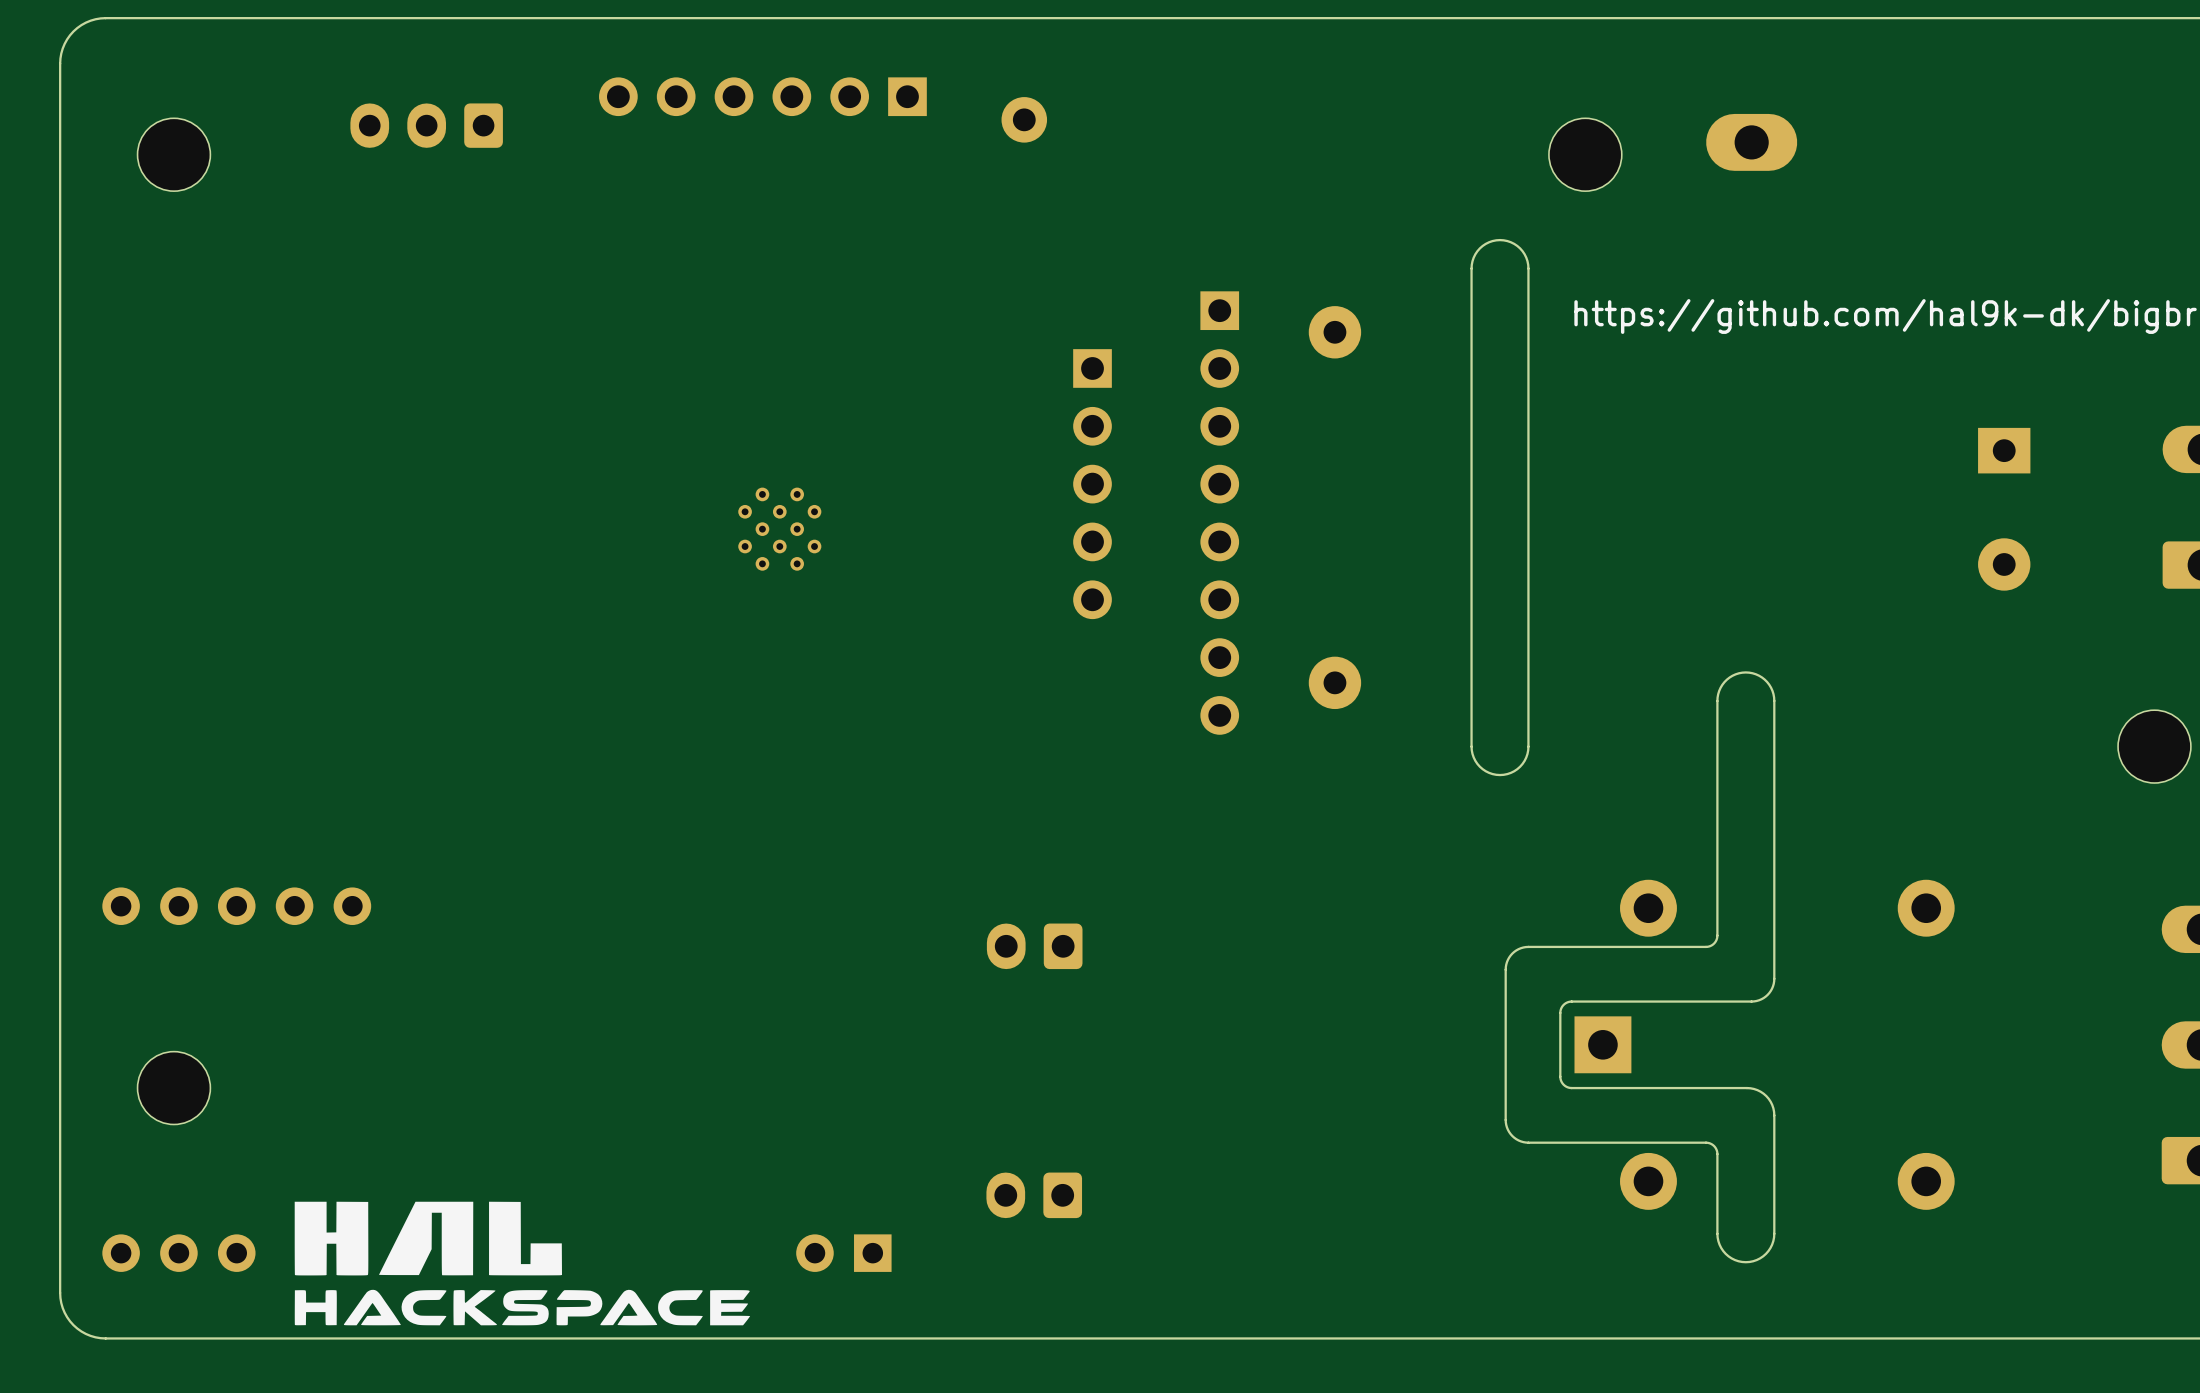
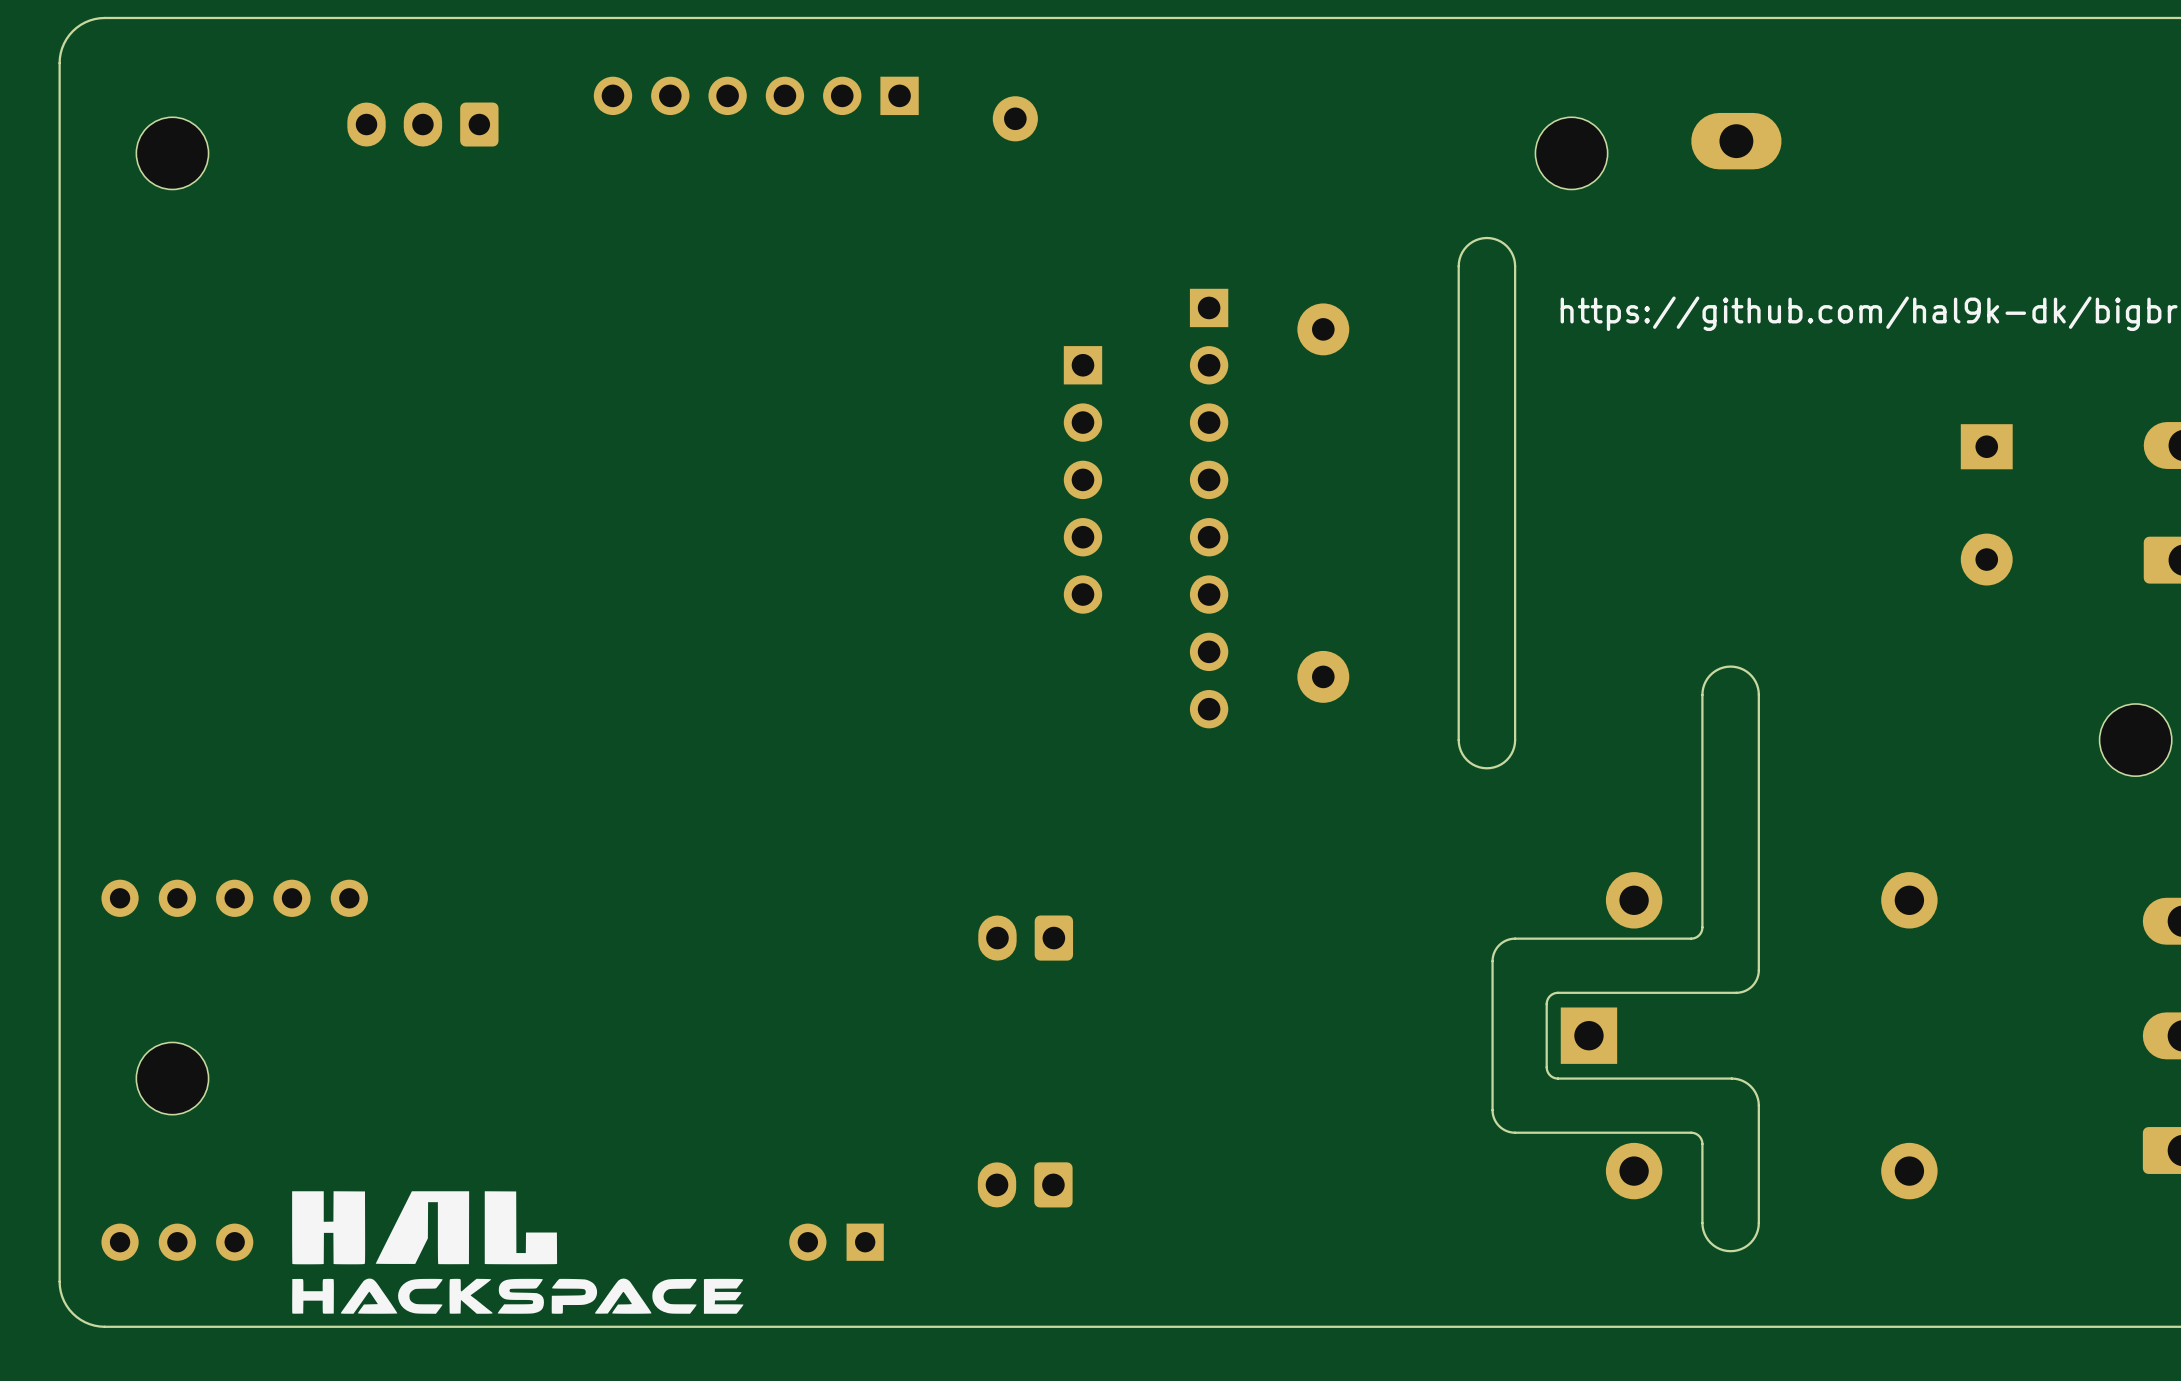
part: (779, 529) -> none

